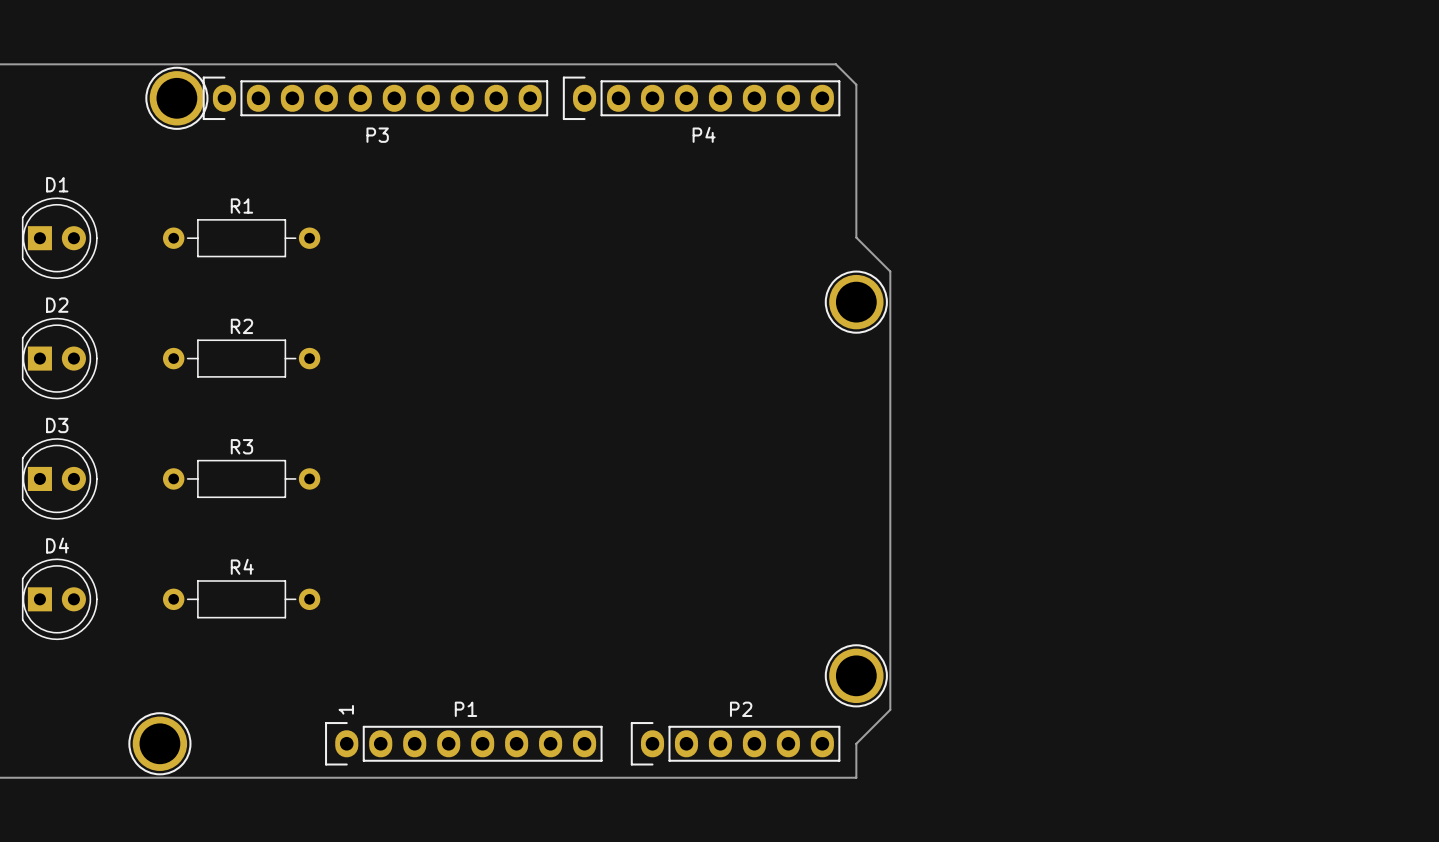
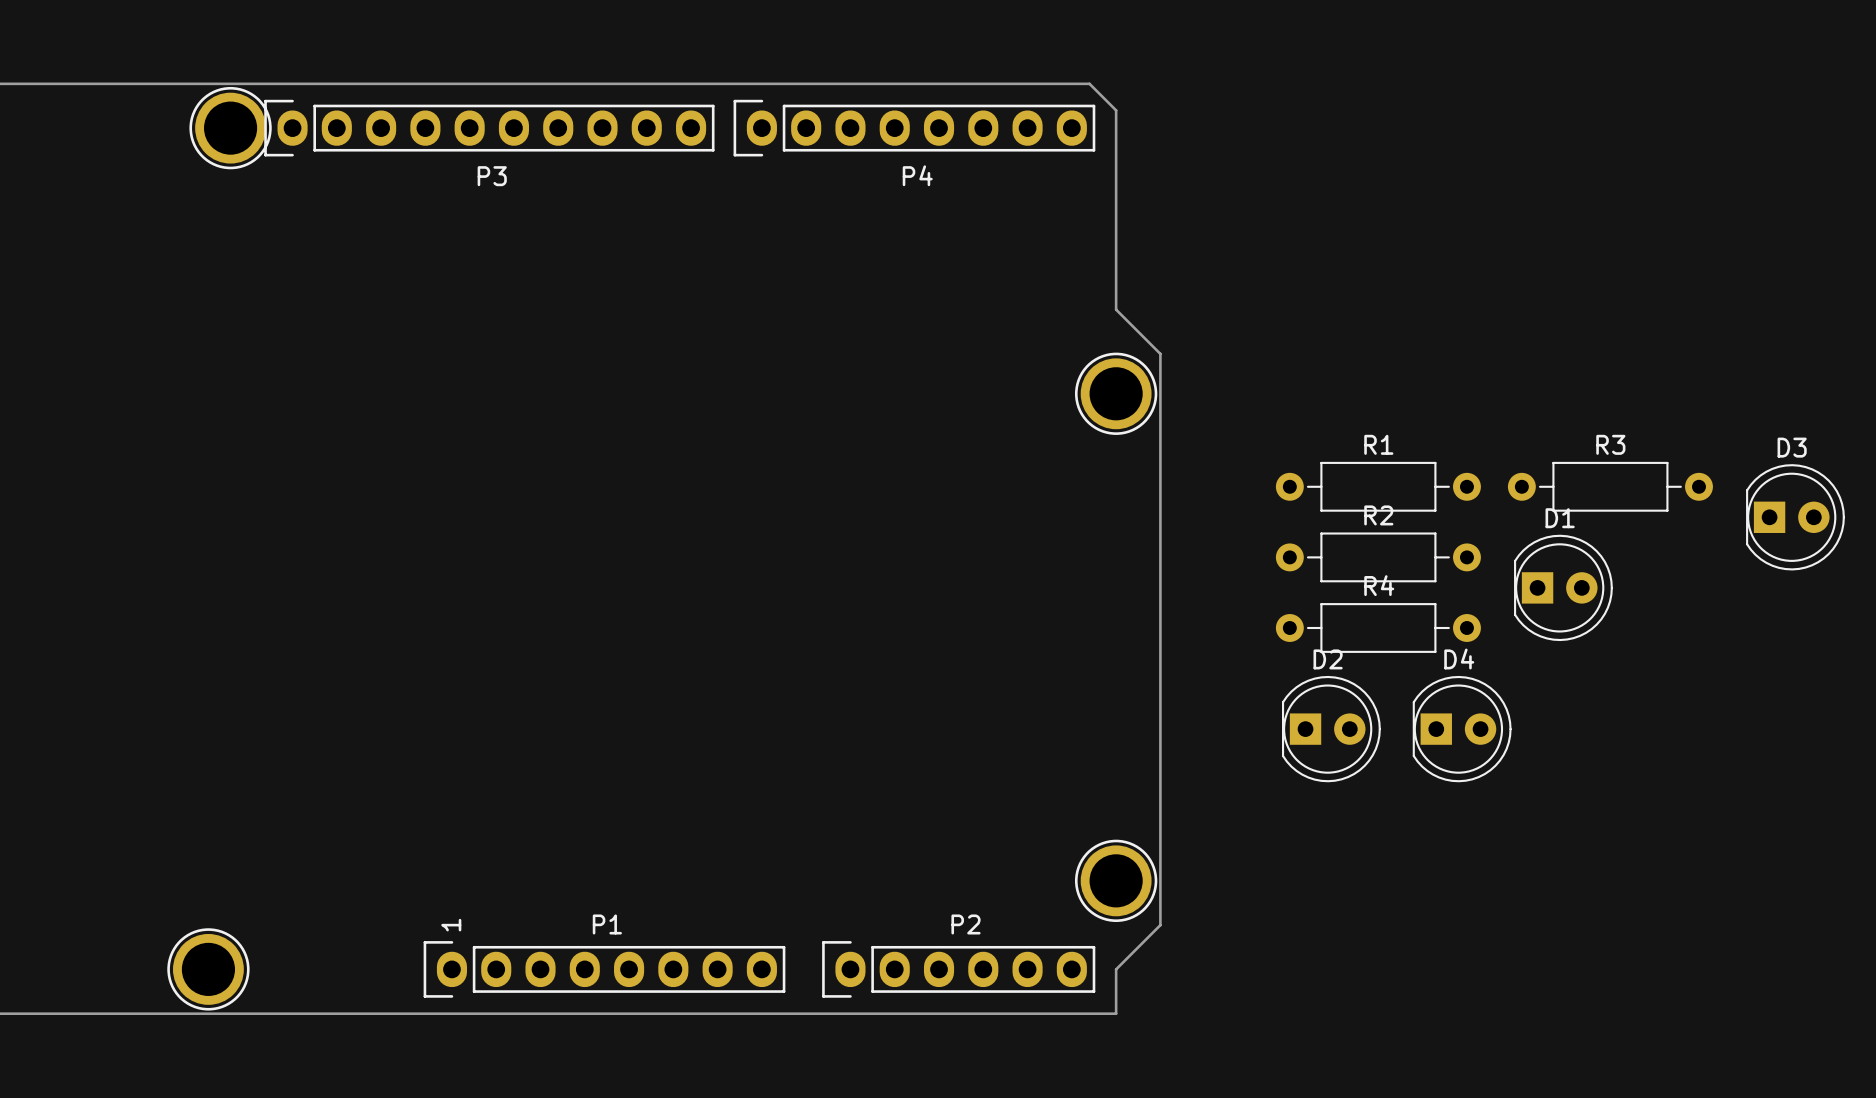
D1 footprint: [21, 197, 98, 279] -> [1514, 534, 1613, 642]
R1 position: (241, 238) -> (1378, 486)
D2 footprint: [21, 317, 98, 400] -> [1282, 675, 1381, 783]
R2 position: (241, 358) -> (1378, 557)
D3 footprint: [21, 438, 98, 520] -> [1746, 464, 1845, 571]
R3 position: (241, 478) -> (1610, 486)
D4 footprint: [21, 558, 98, 641] -> [1412, 675, 1512, 783]
R4 position: (241, 599) -> (1378, 627)

